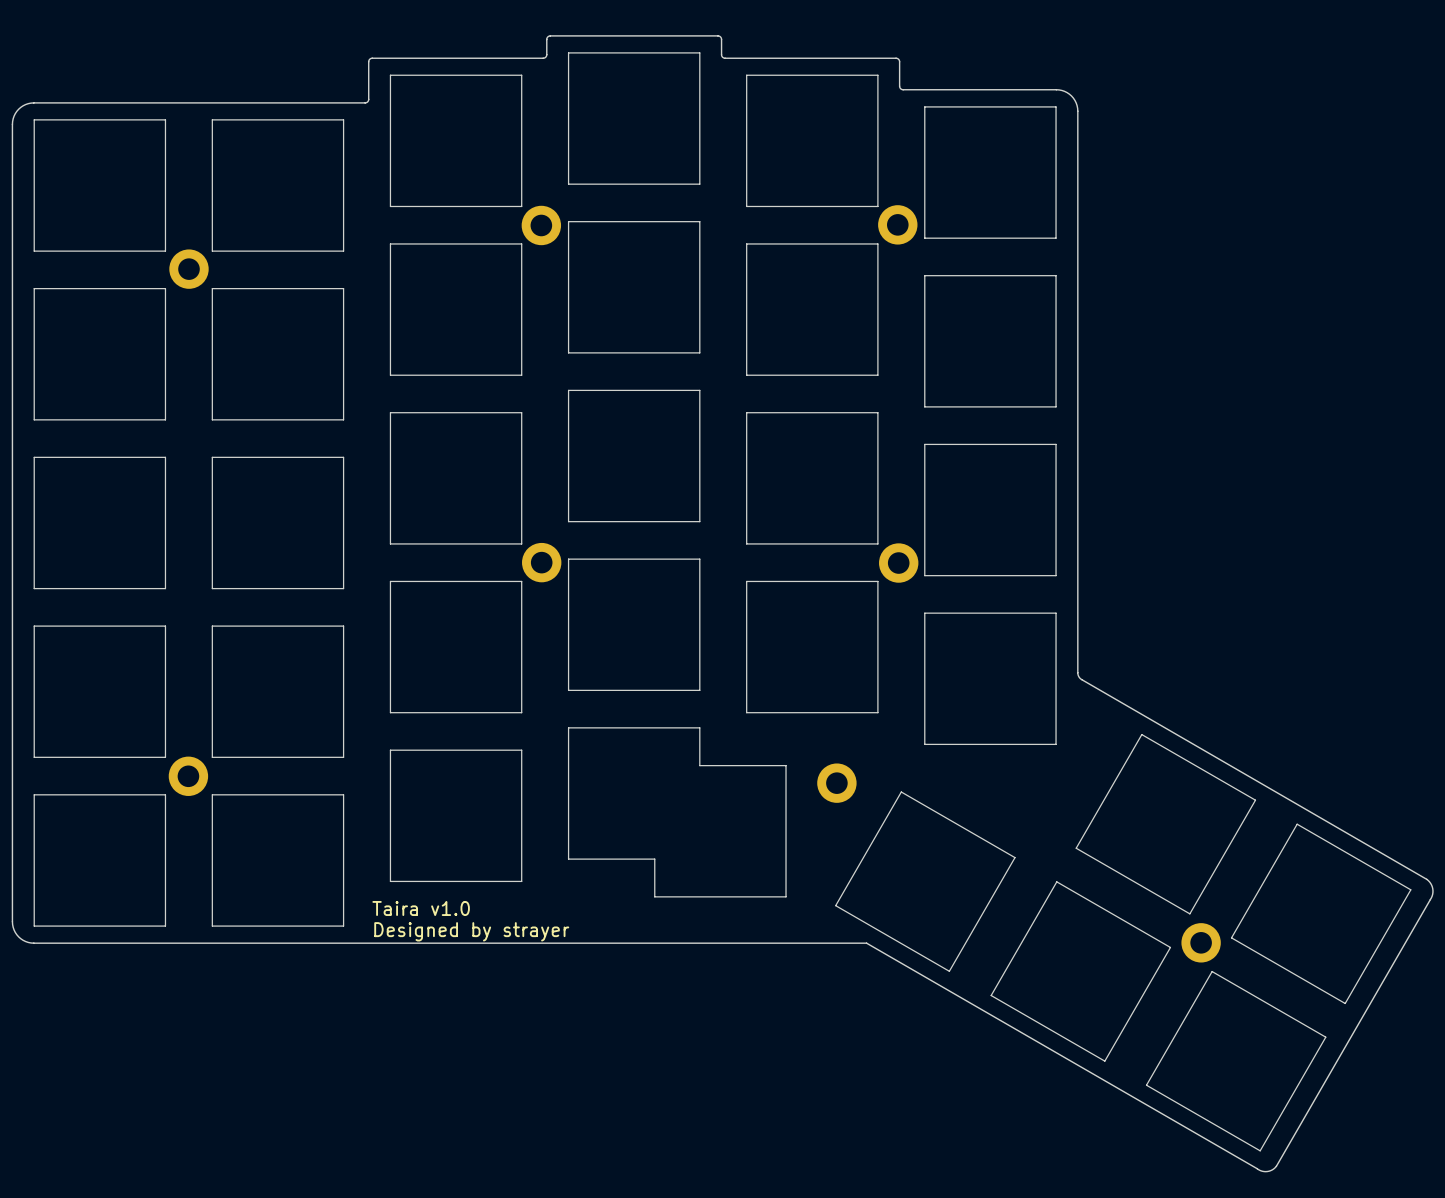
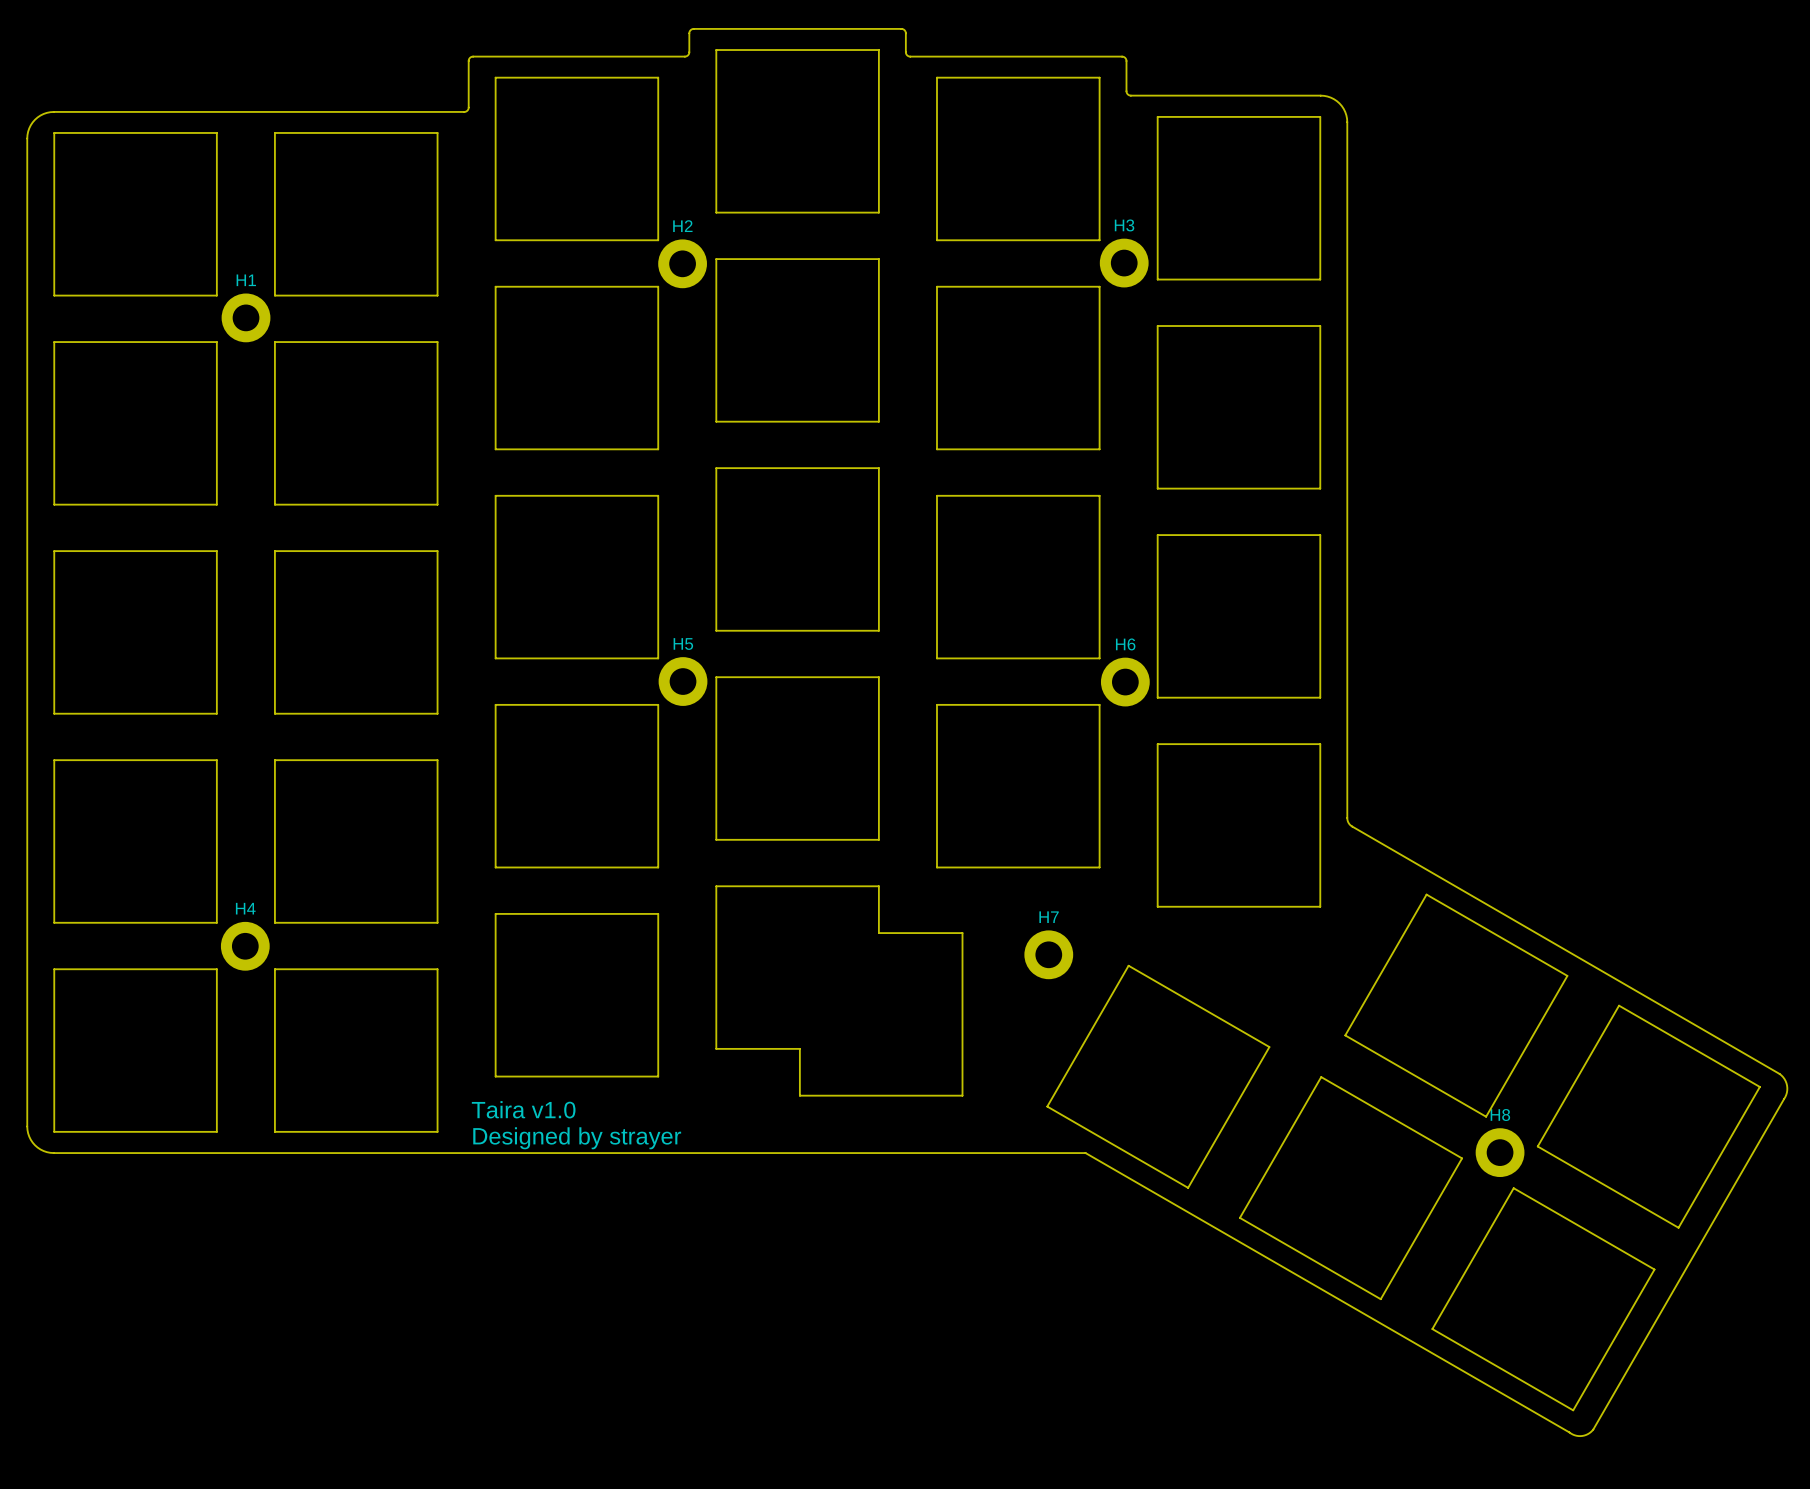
H3 name: none -> H3 (1124, 225)
H2 name: none -> H2 (682, 226)
H1 name: none -> H1 (246, 280)
H5 name: none -> H5 (683, 644)
H6 name: none -> H6 (1125, 644)
drawing shape: [568, 727, 787, 898] -> [715, 885, 964, 1097]
H4 name: none -> H4 (245, 908)
H7 name: none -> H7 (1049, 917)
H8 name: none -> H8 (1500, 1115)

